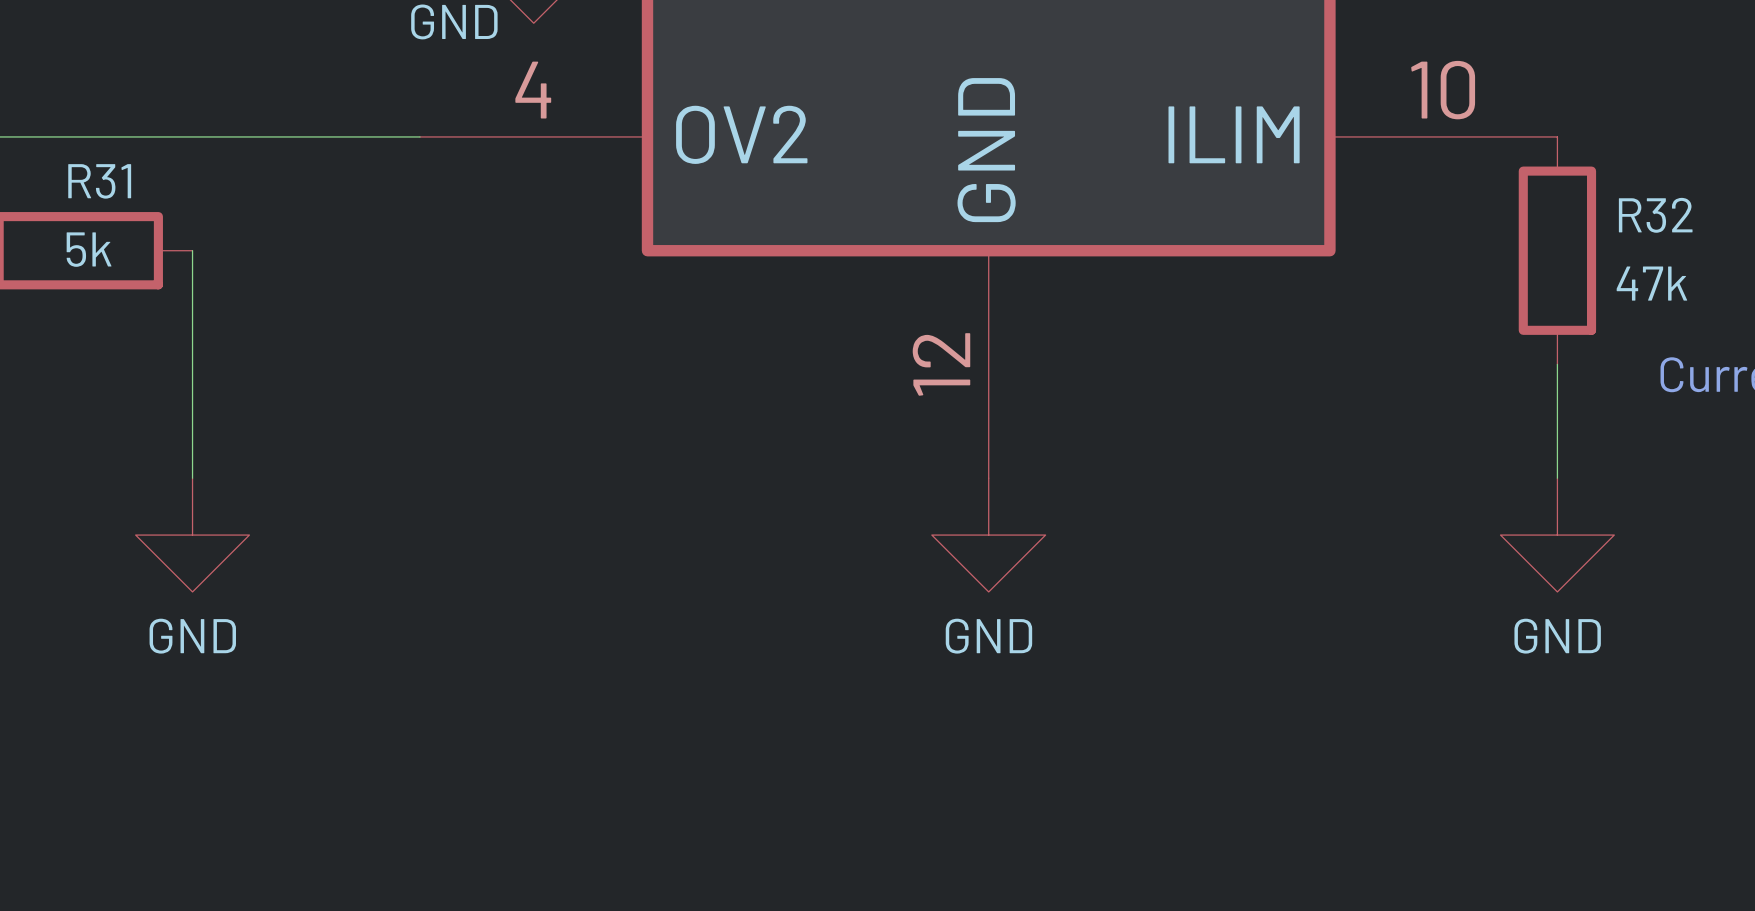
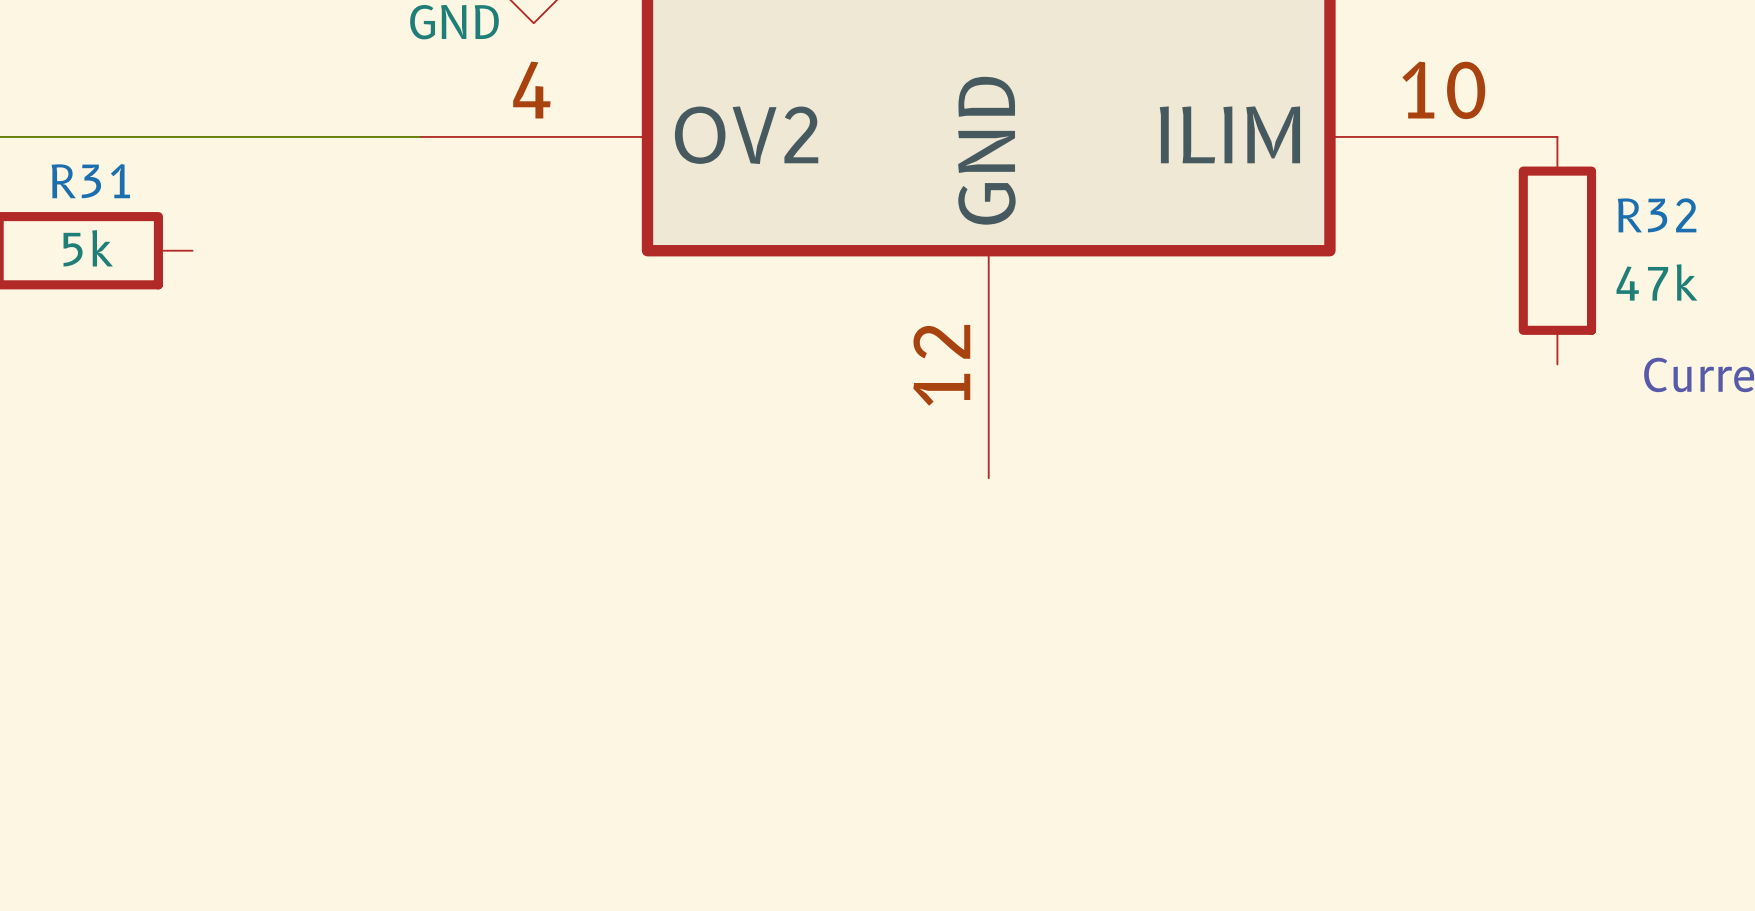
wire: (192, 250) (192, 478) -> none
wire: (1557, 364) (1557, 478) -> none
power symbol: GND (192, 535) -> none
power symbol: GND (988, 535) -> none
power symbol: GND (1557, 535) -> none

